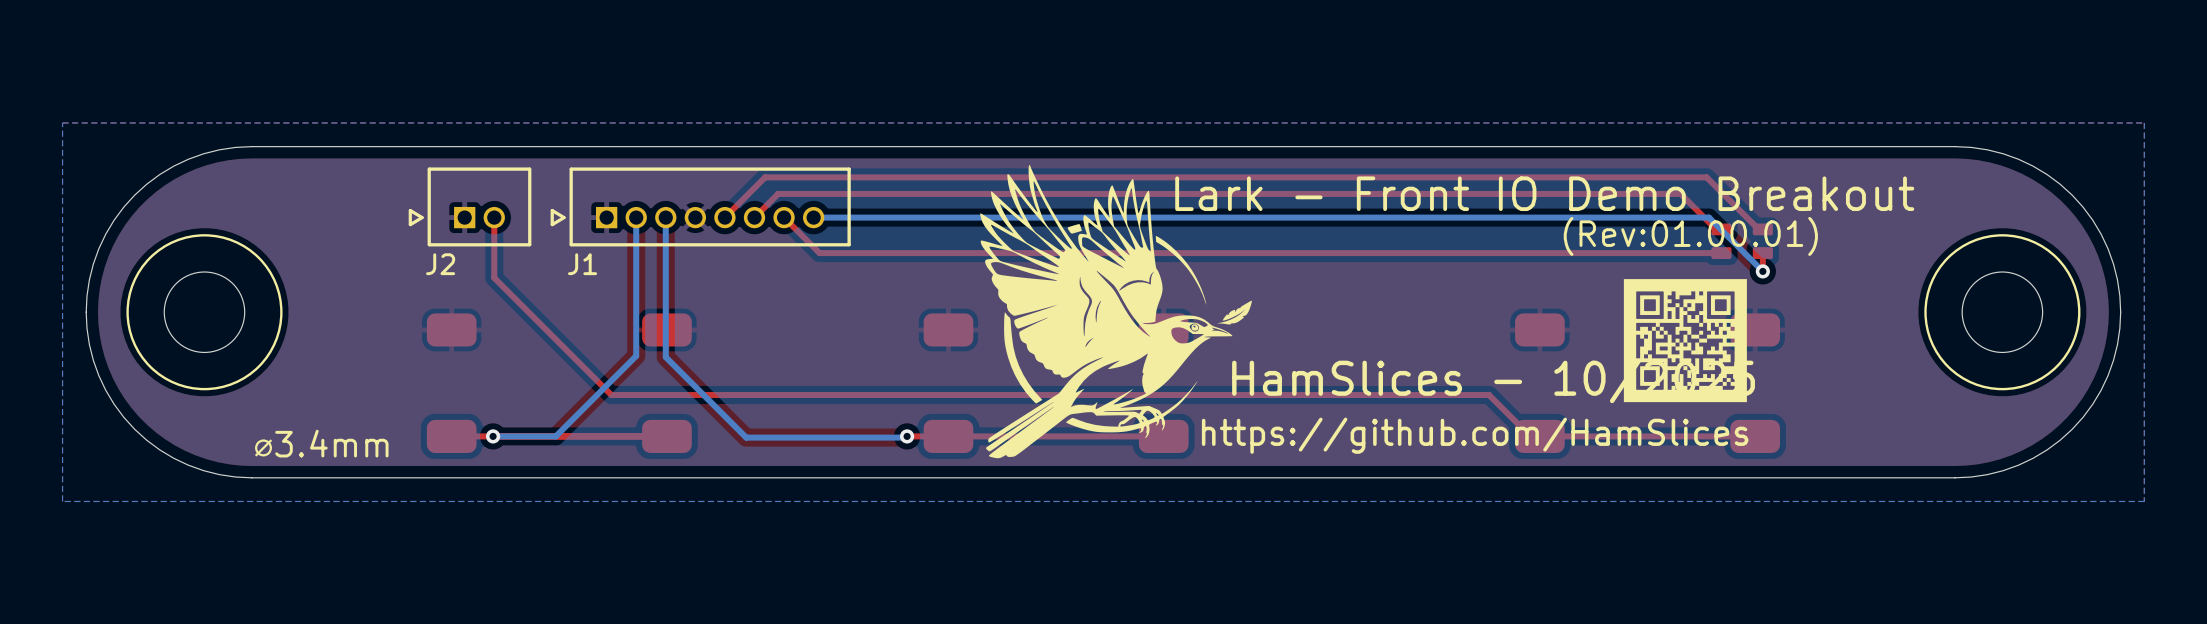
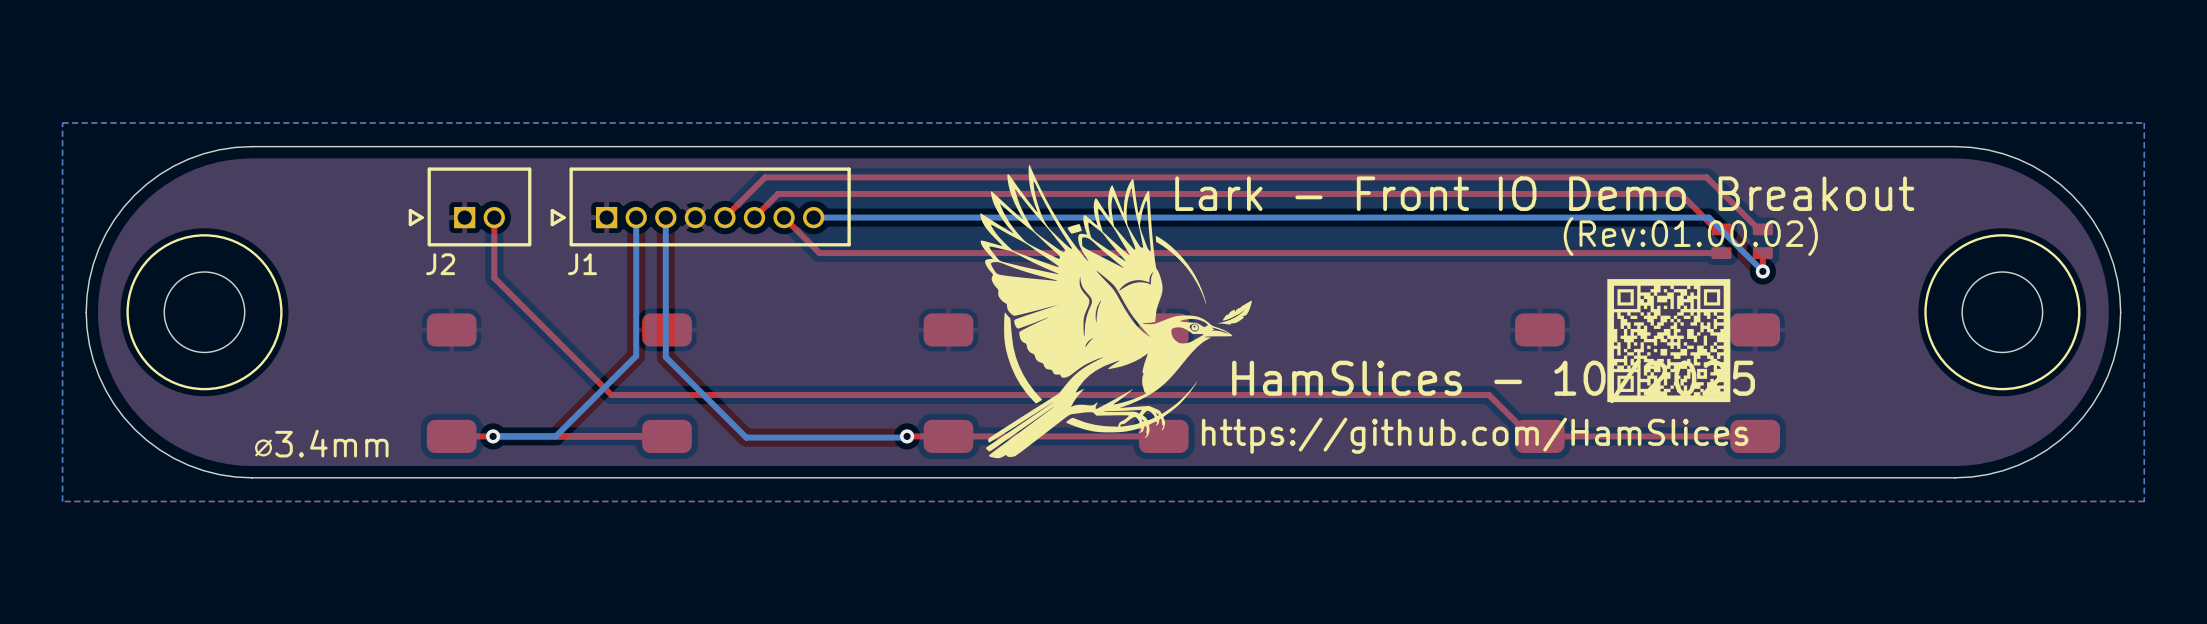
text: (Rev:01.00.01) (1690, 236) -> (Rev:01.00.02) (1690, 236)
drawing shape: [1623, 279, 1747, 403] -> [1607, 279, 1731, 403]

